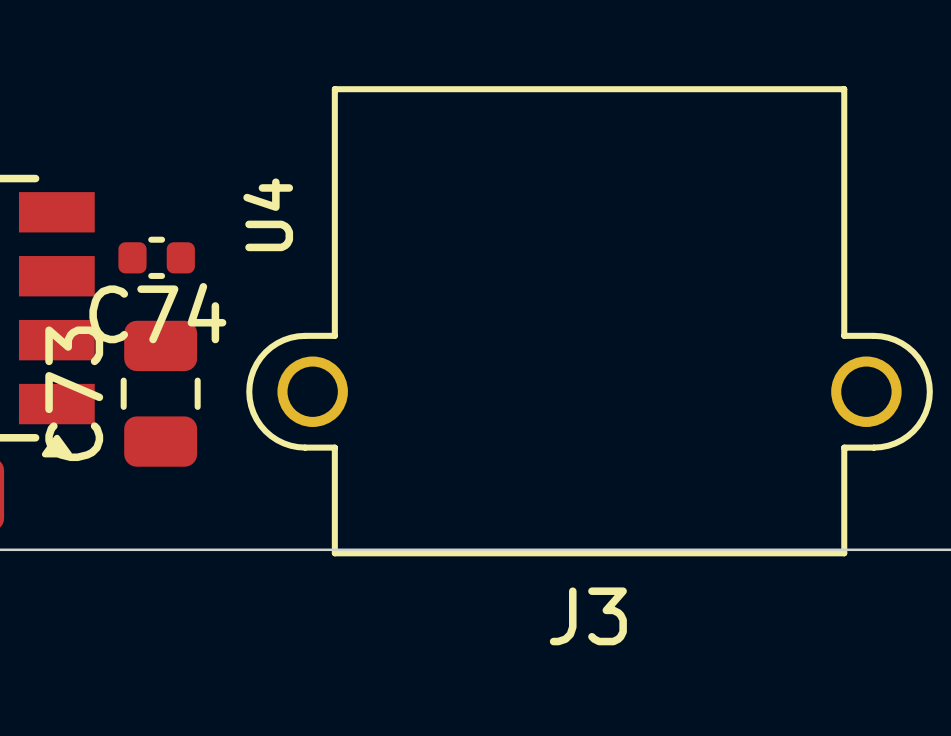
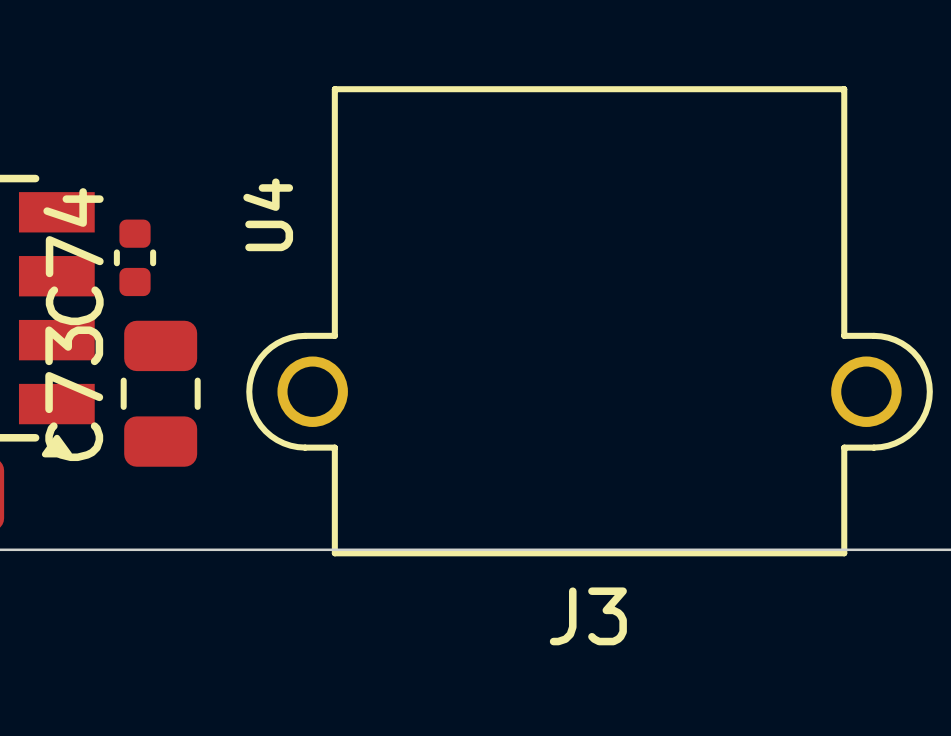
C74 rotation: 0° (156, 257) -> 90° clockwise (135, 257)

